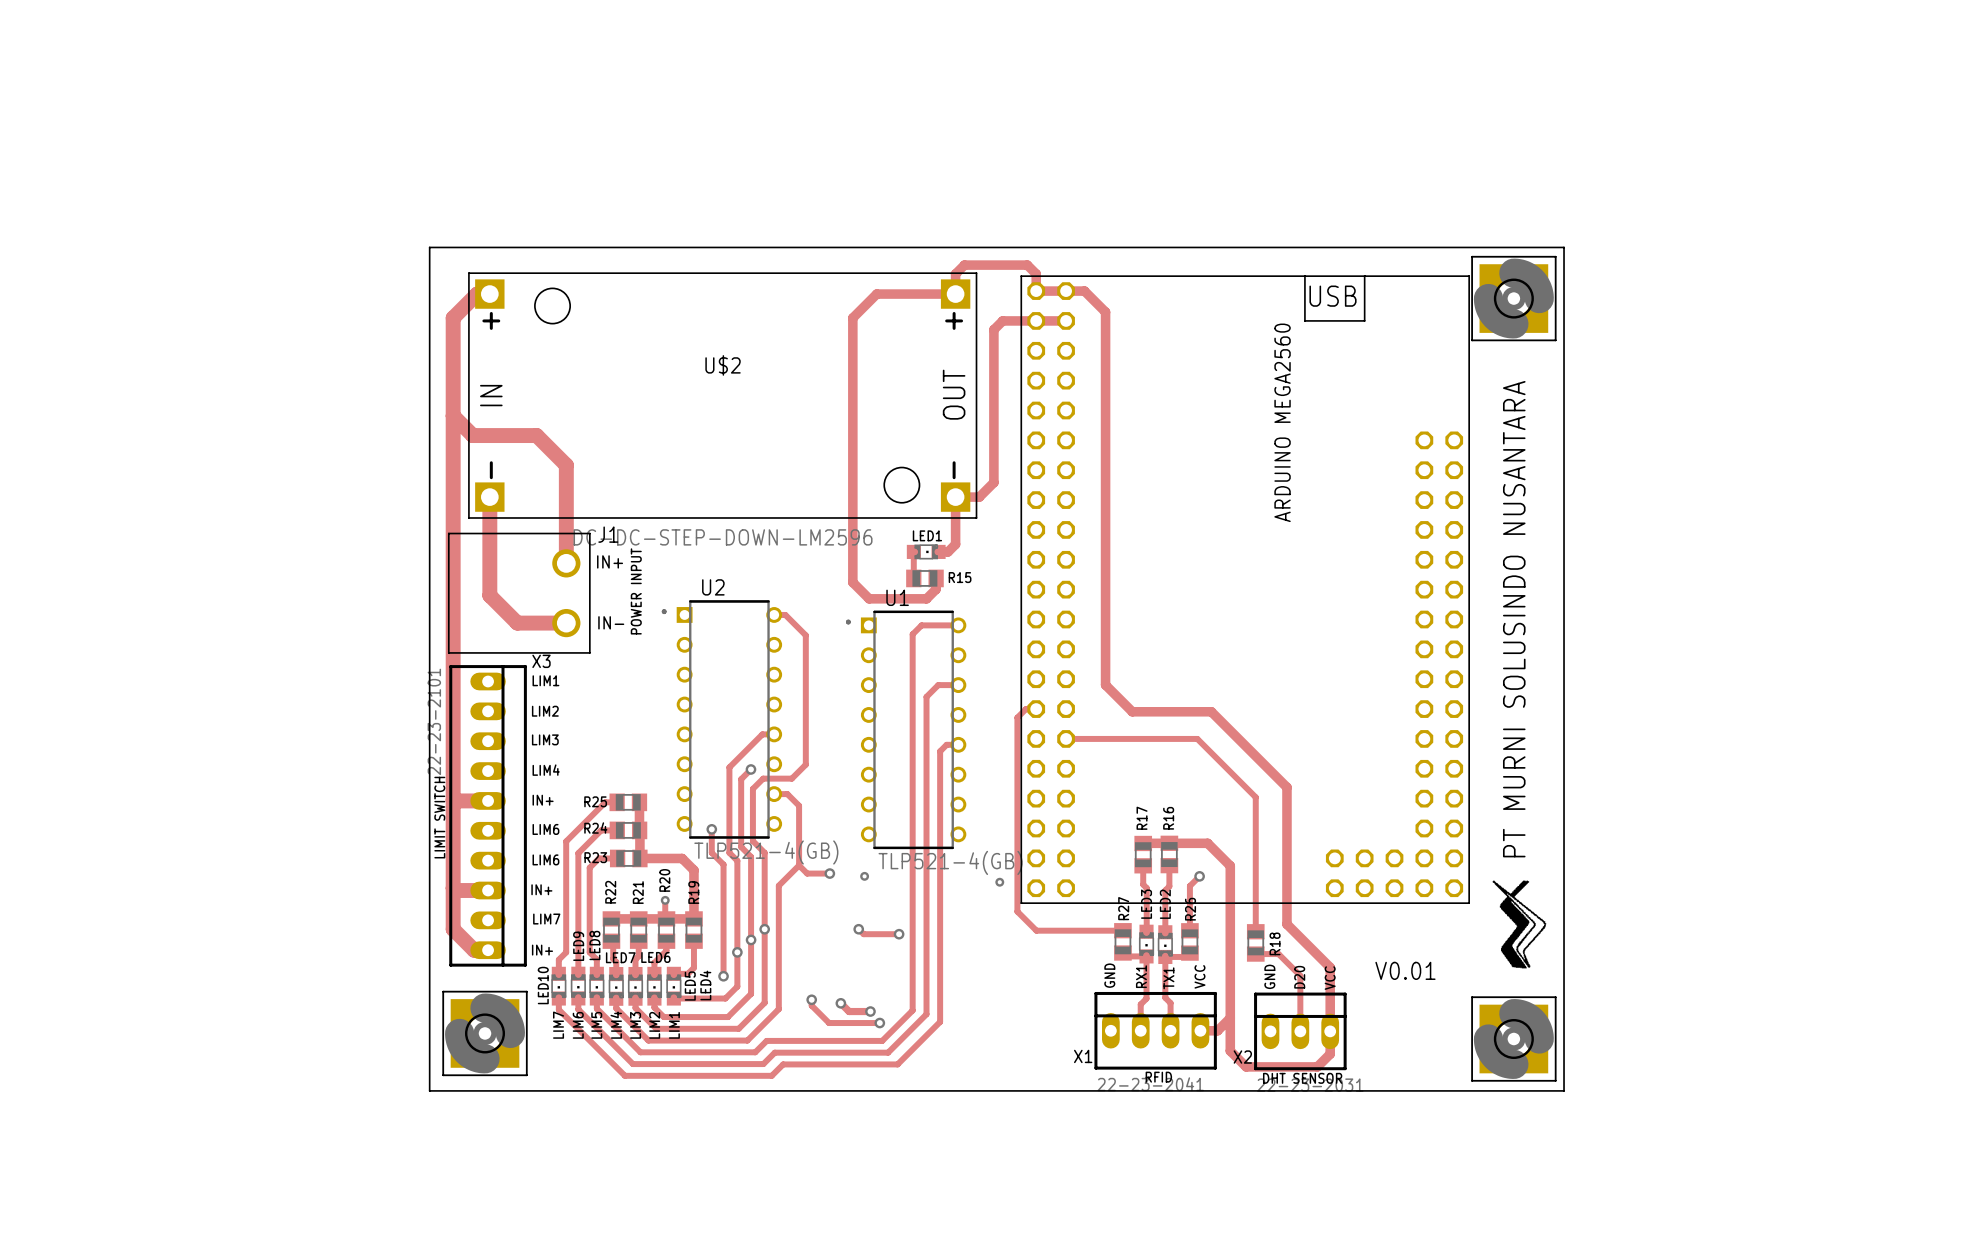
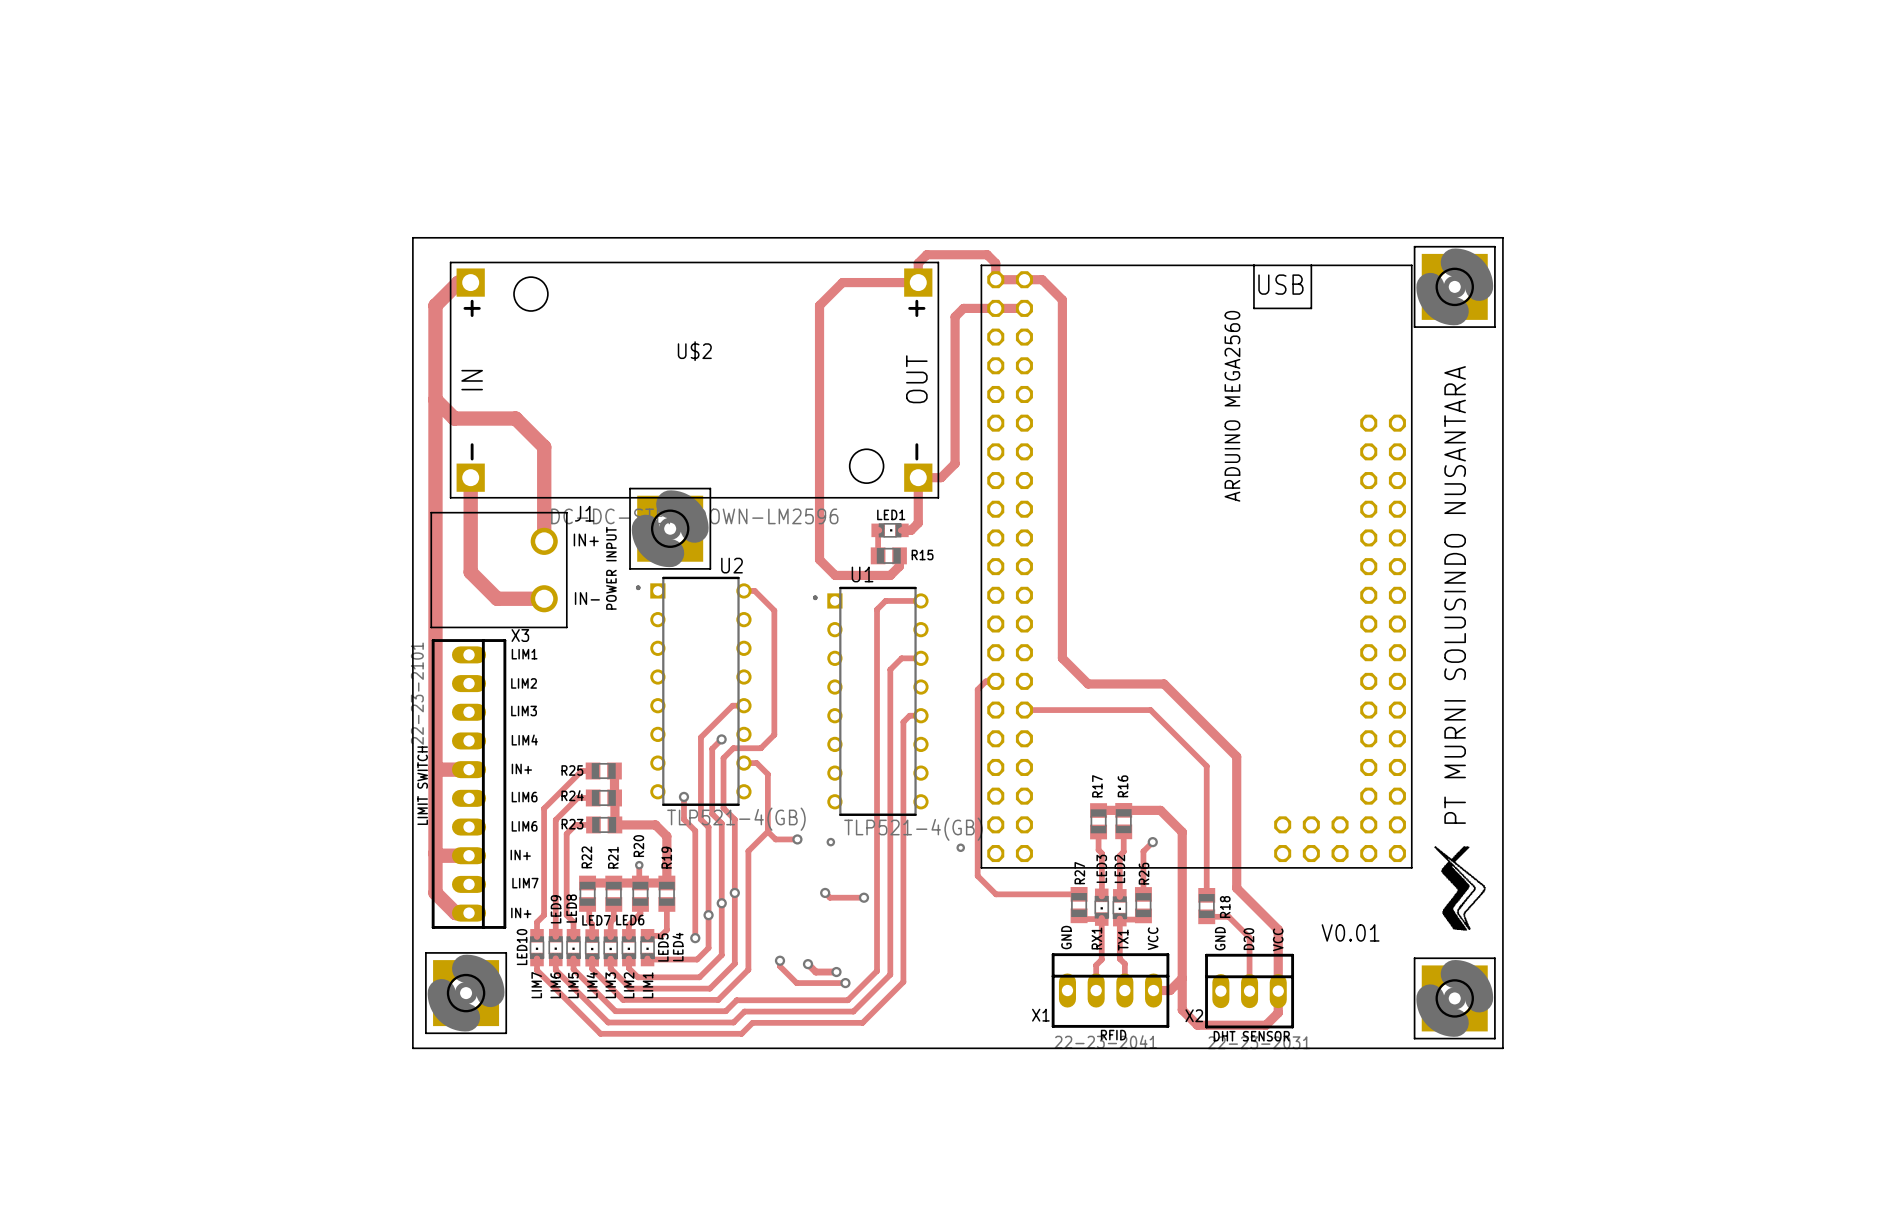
part: none -> (670, 528)
U2 name position: U2 (713, 587) -> U2 (731, 565)

